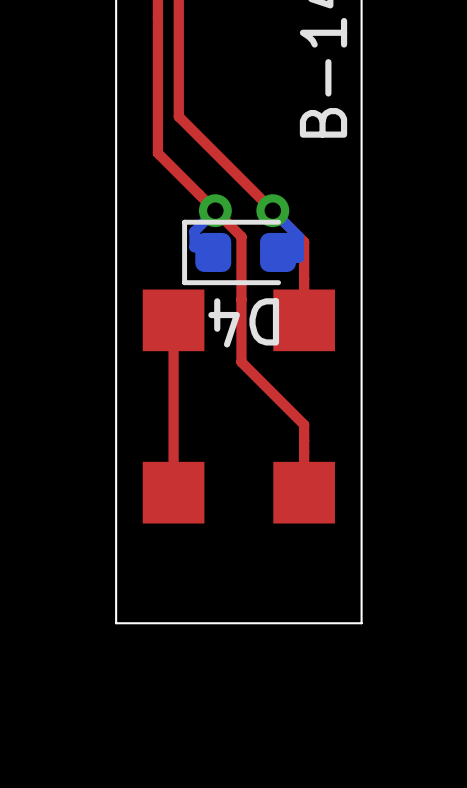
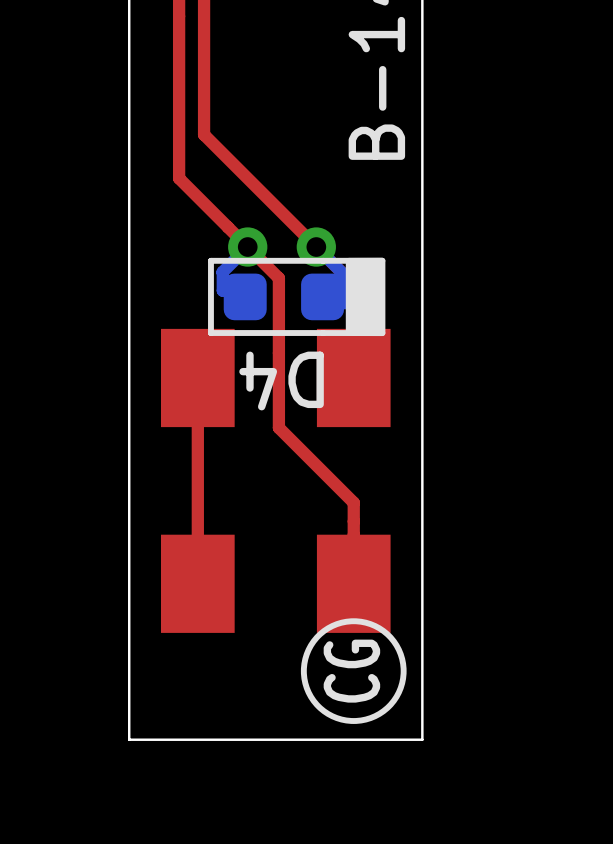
D4 footprint: [182, 219, 297, 286] -> [208, 257, 386, 337]
part footprint: [142, 289, 205, 352] -> [161, 328, 235, 428]
part footprint: [273, 289, 335, 352] -> [316, 328, 391, 428]
part footprint: [142, 461, 205, 524] -> [161, 534, 235, 633]
part footprint: [273, 461, 335, 524] -> [316, 534, 391, 633]
drawing: none -> [300, 618, 407, 724]
text: none -> CG (351, 671)

